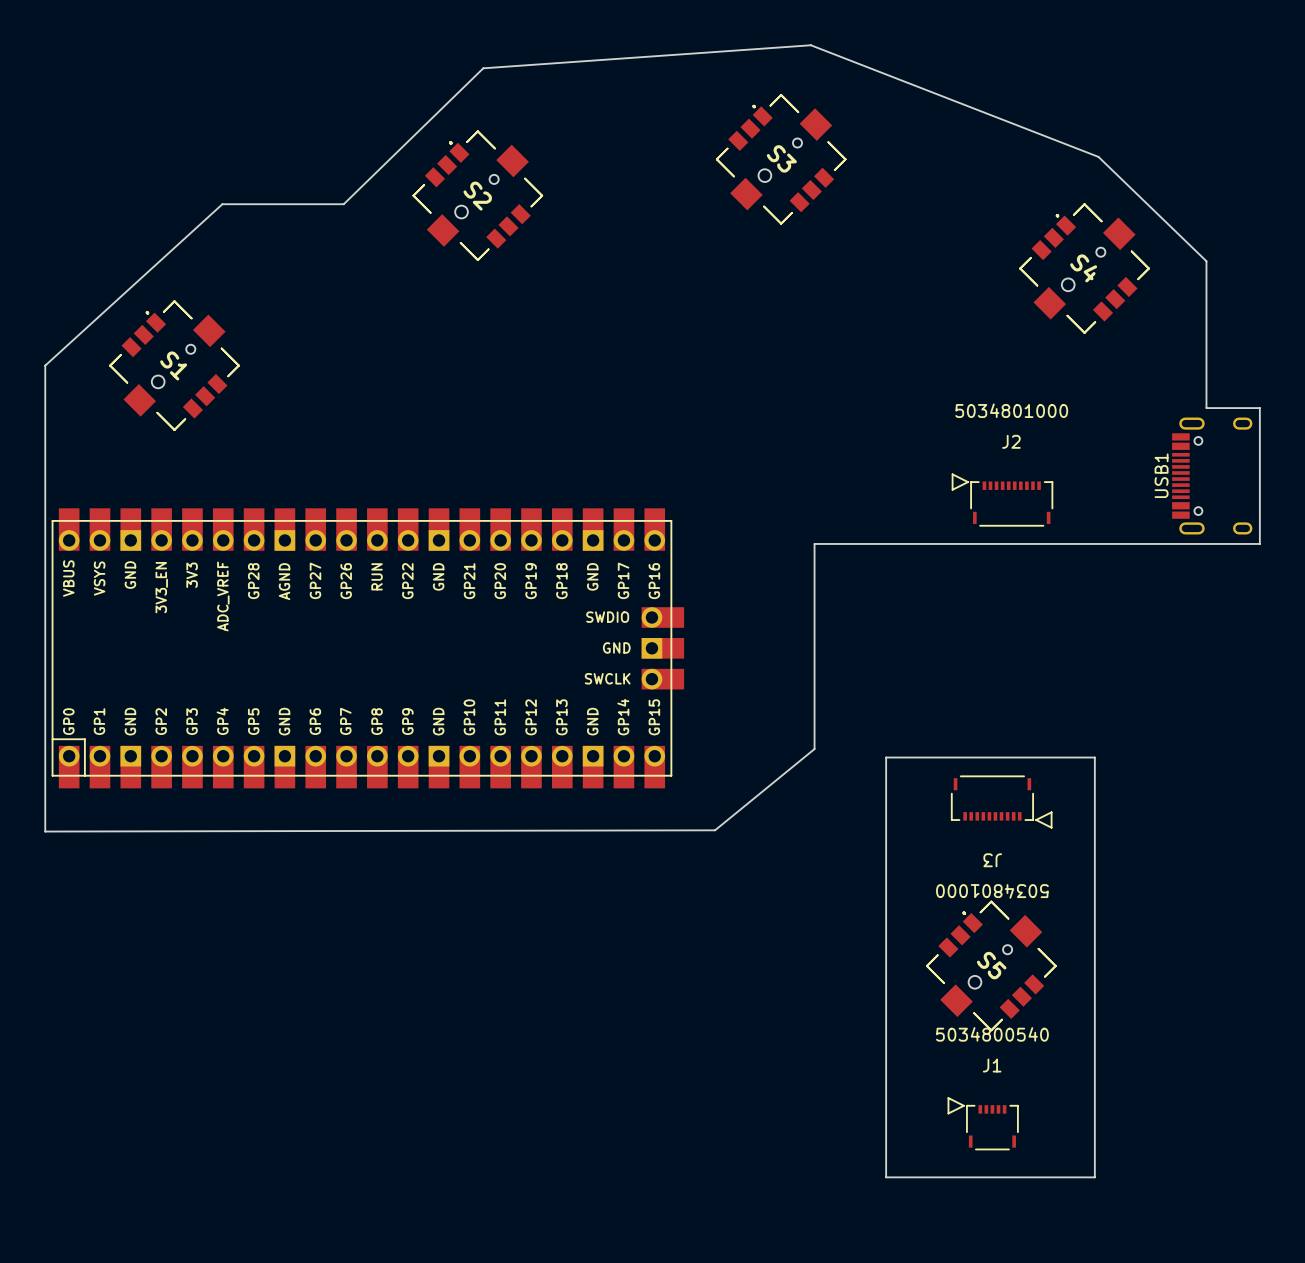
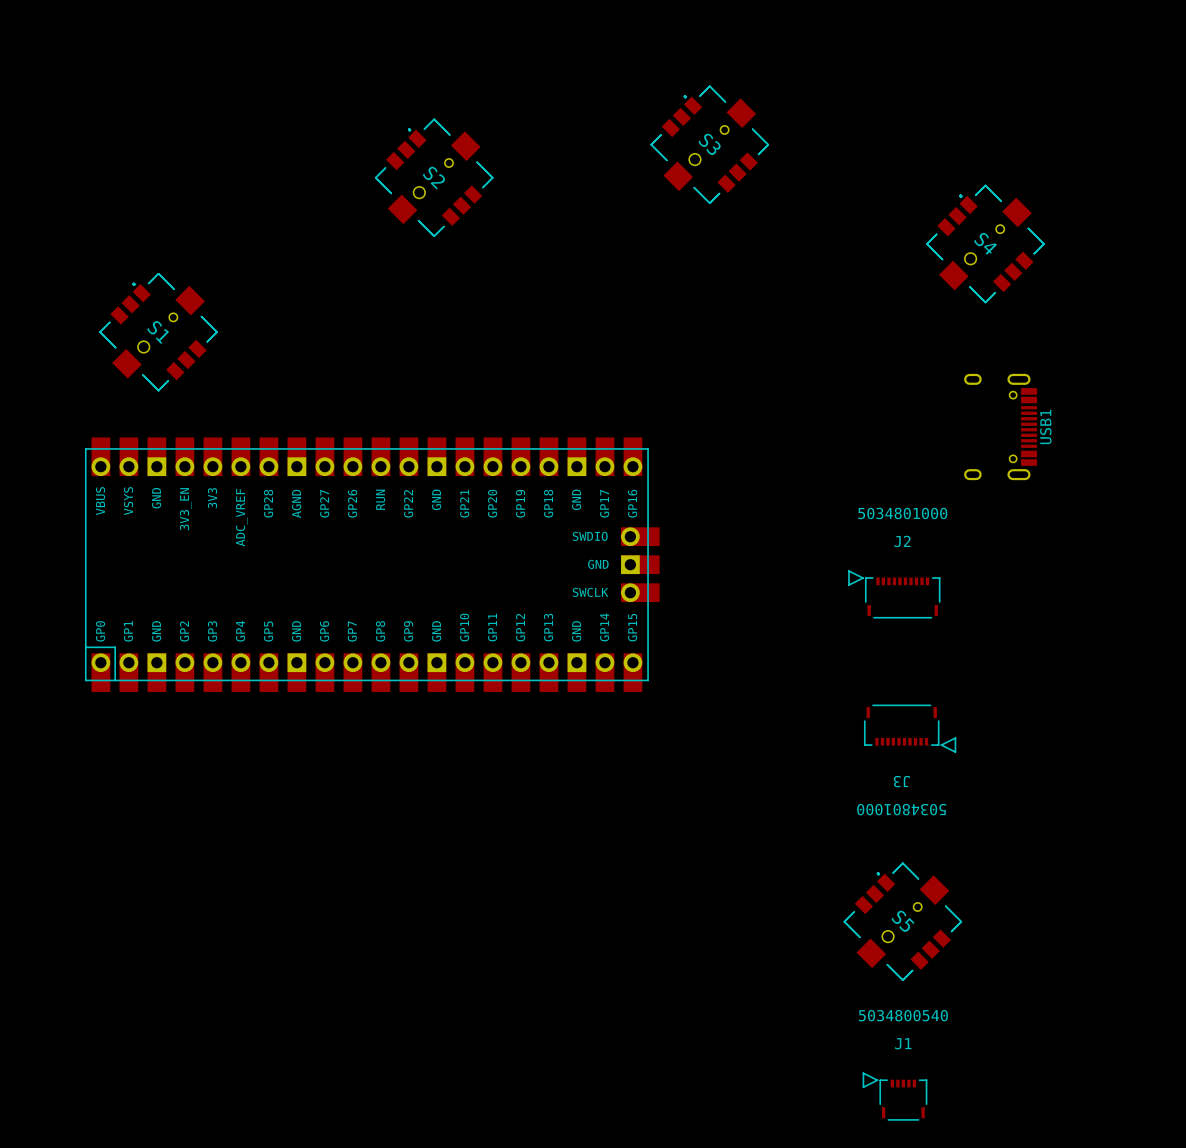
board edge: (810, 45) (1098, 156) (1206, 261) (1206, 408) (1259, 408) (1259, 543) (814, 543) (814, 749) (715, 830) (45, 831) (45, 365) (222, 204) (343, 204) (483, 68) (810, 45) -> none
USB1 rotation: 0° (1212, 476) -> 180° (1000, 426)
USB1 position: (1212, 476) -> (1000, 426)
J2 position: (1002, 500) -> (894, 594)
part position: (367, 648) -> (372, 564)
board edge: (886, 757) (1094, 757) (1094, 1177) (886, 1177) (886, 757) -> none
S5 position: (991, 965) -> (902, 921)
J1 position: (983, 1123) -> (894, 1096)

